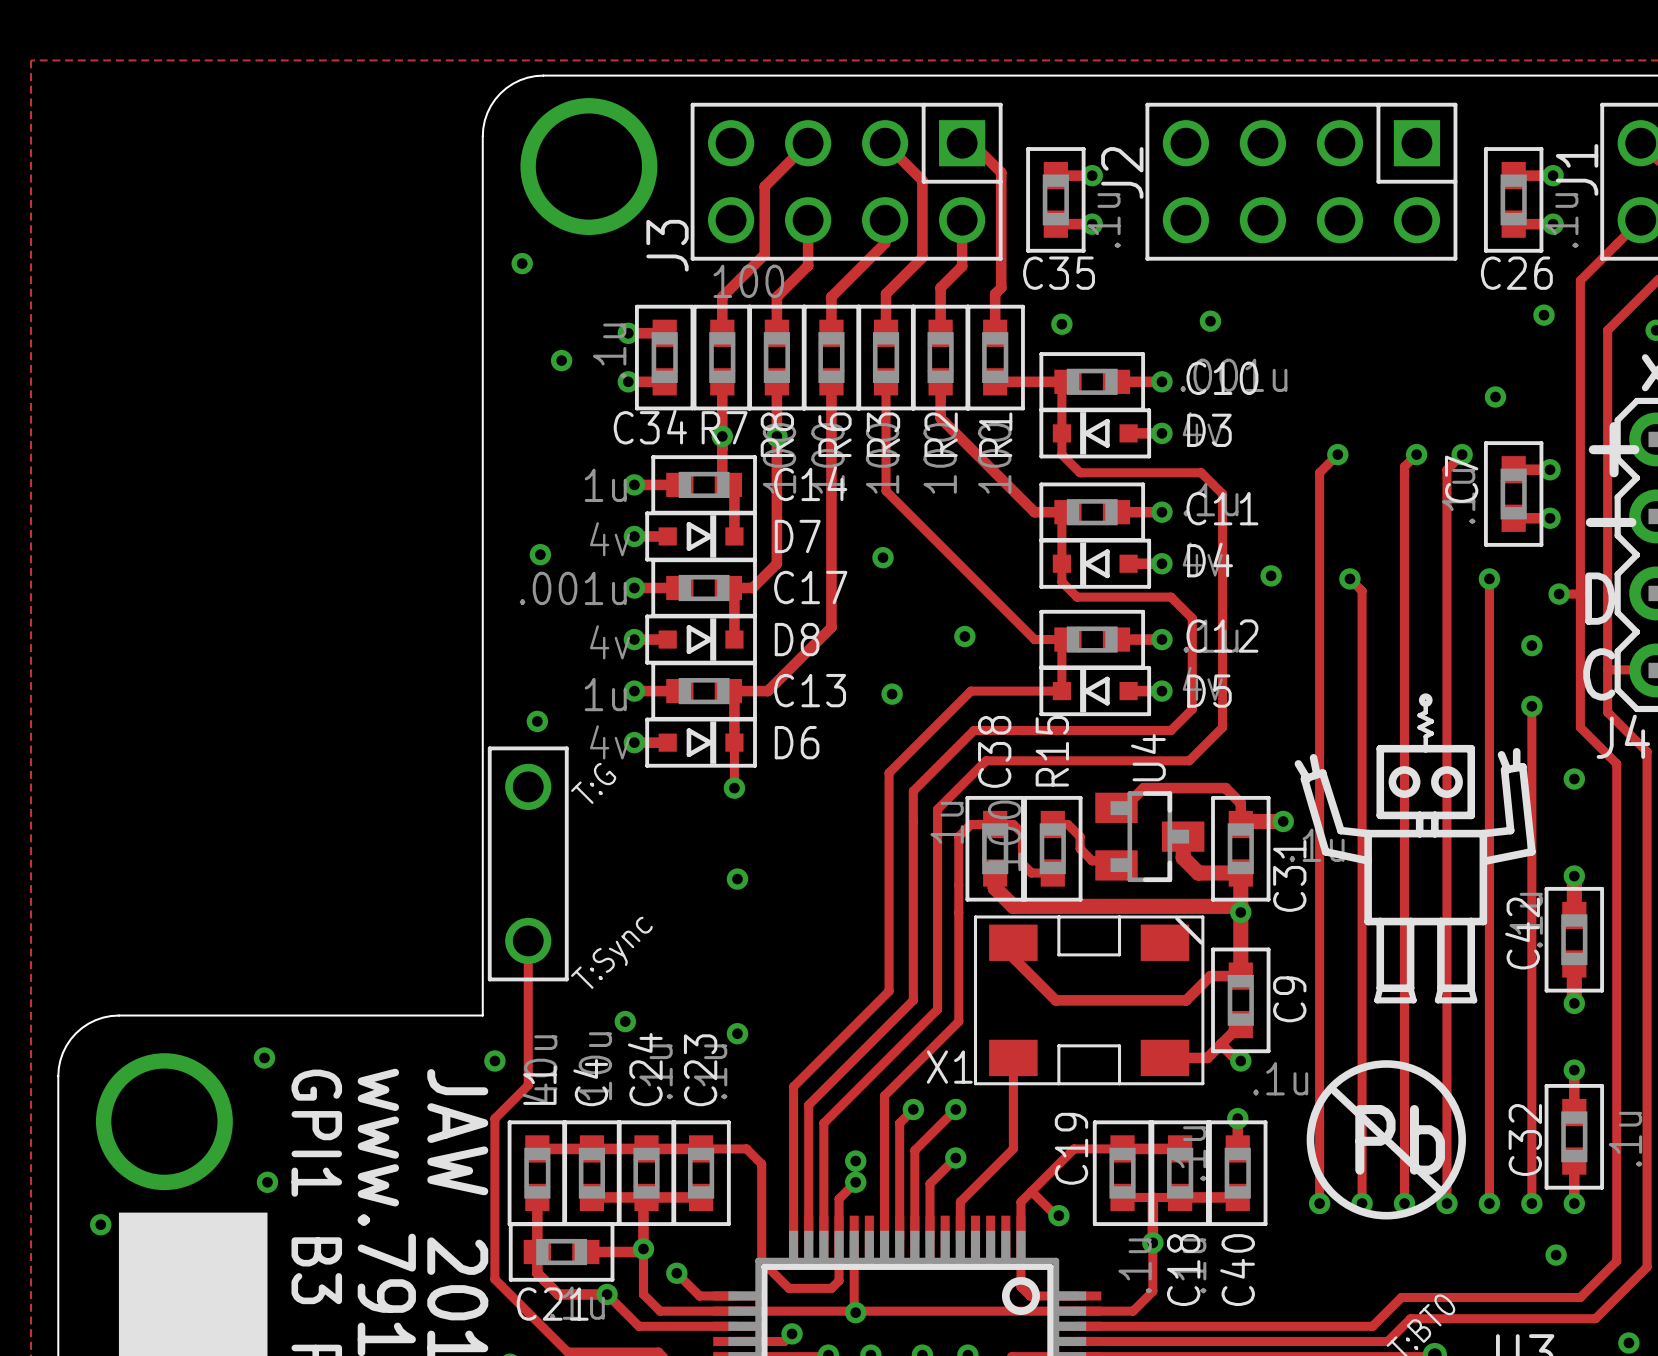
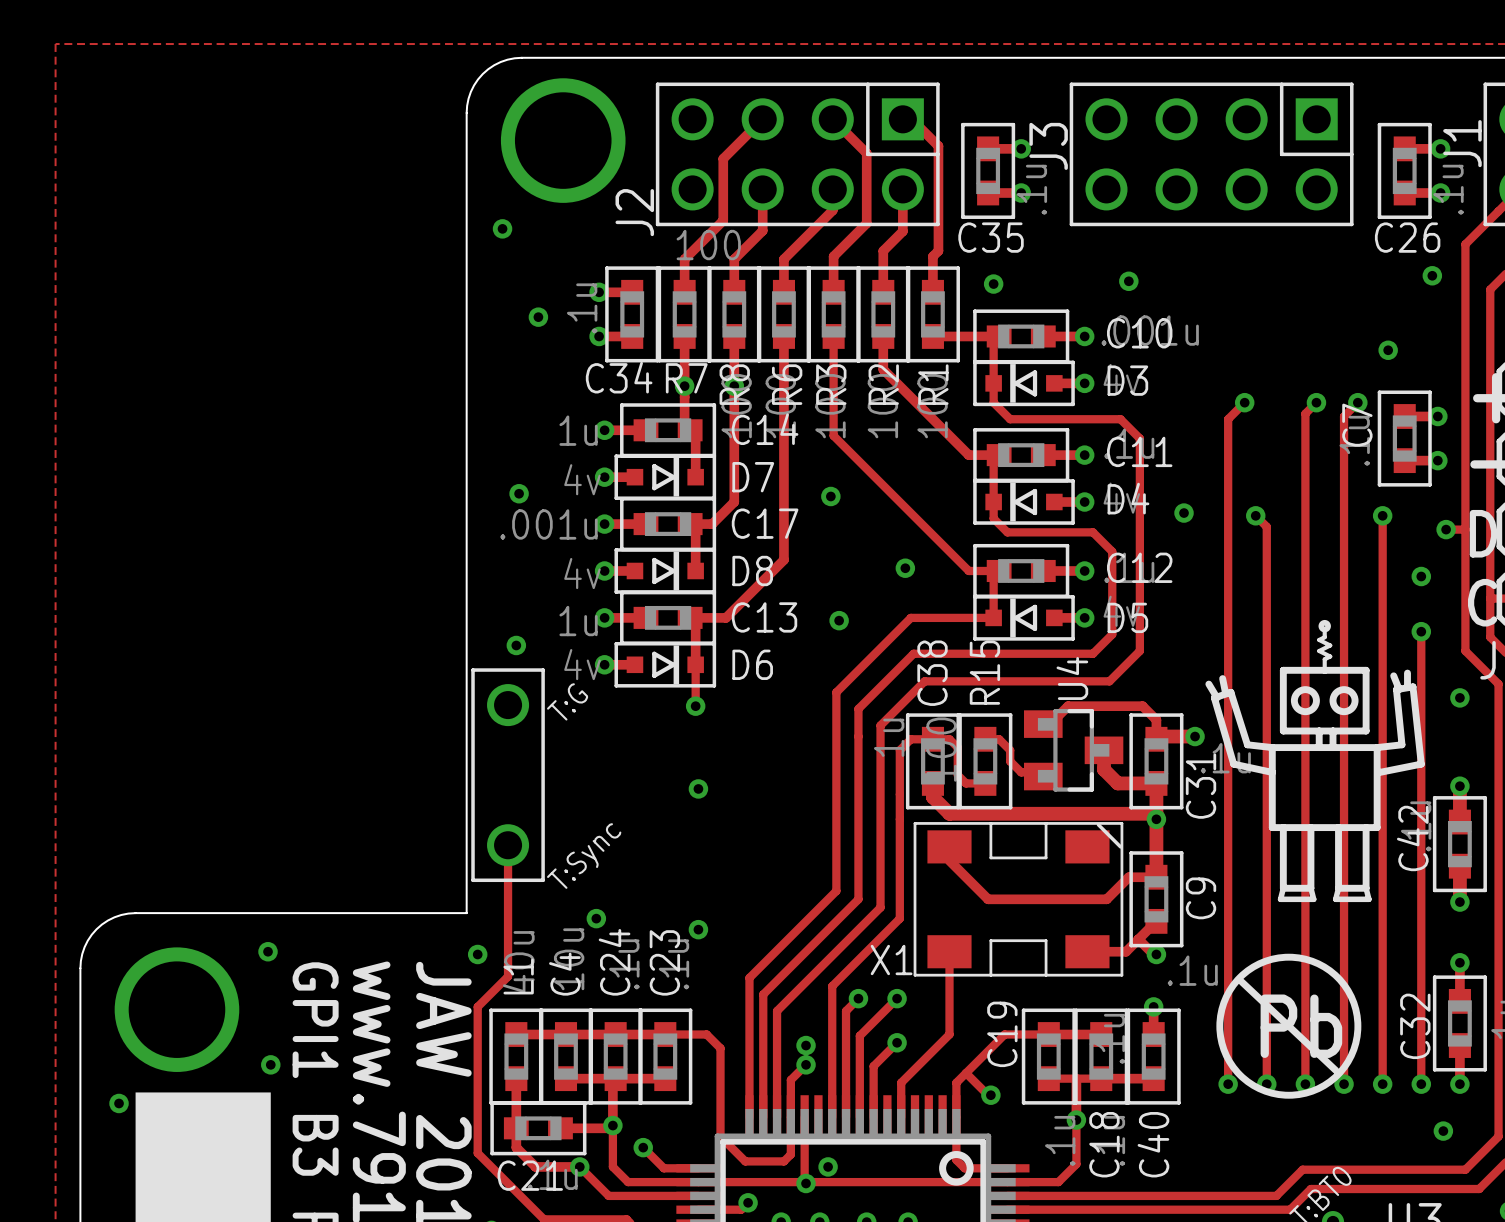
J2 name: J2 (1122, 172) -> J3 (1048, 146)
J3 name: J3 (667, 245) -> J2 (634, 212)
via: none -> (828, 1166)

